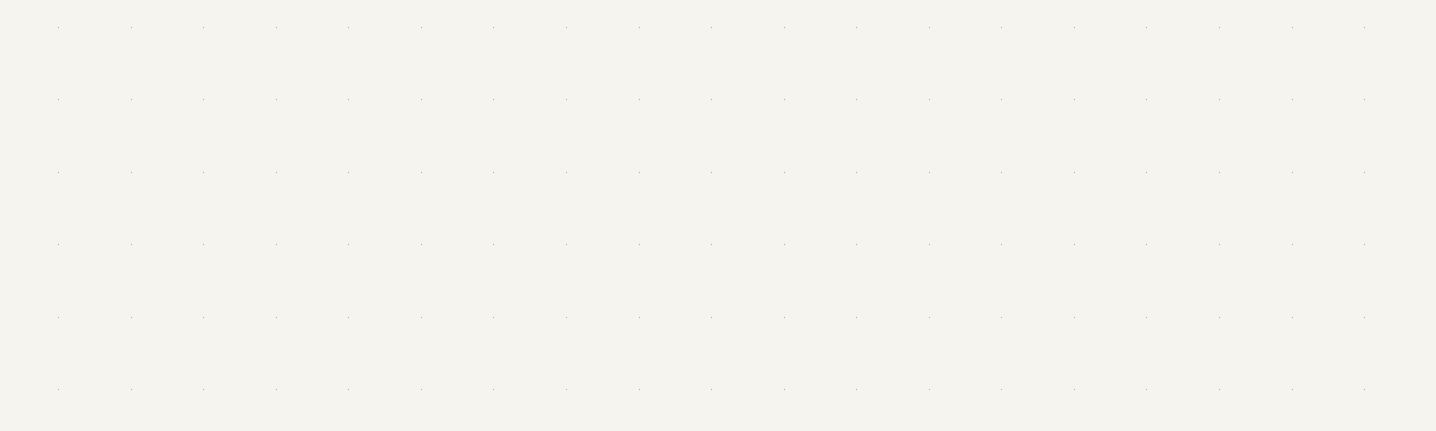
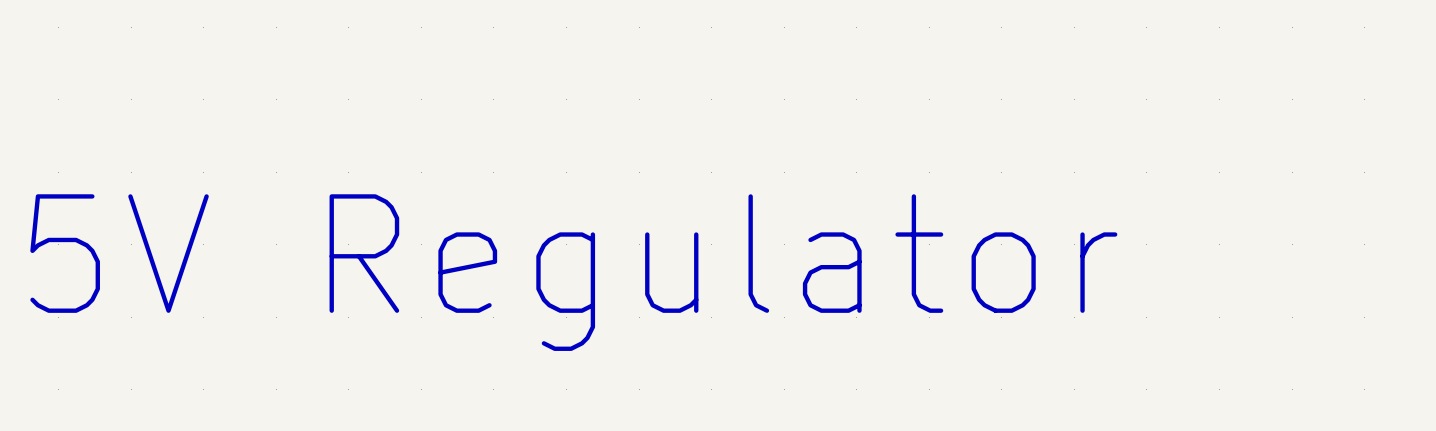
text: none -> 5V Regulator (573, 272)

